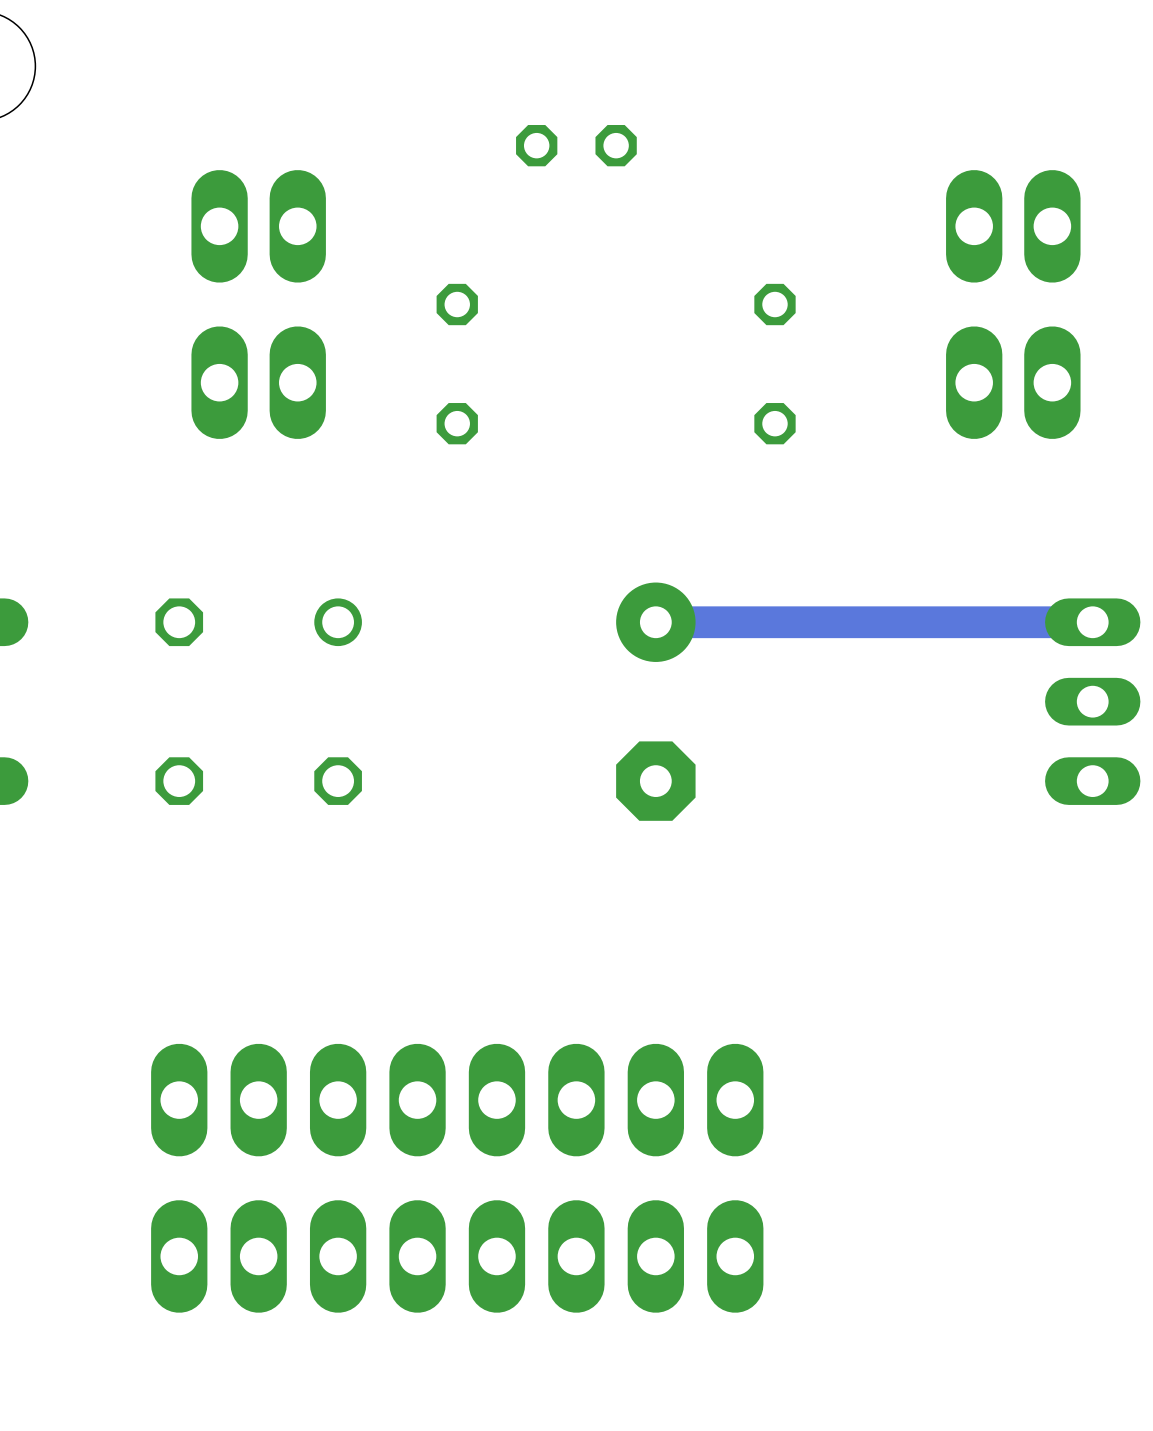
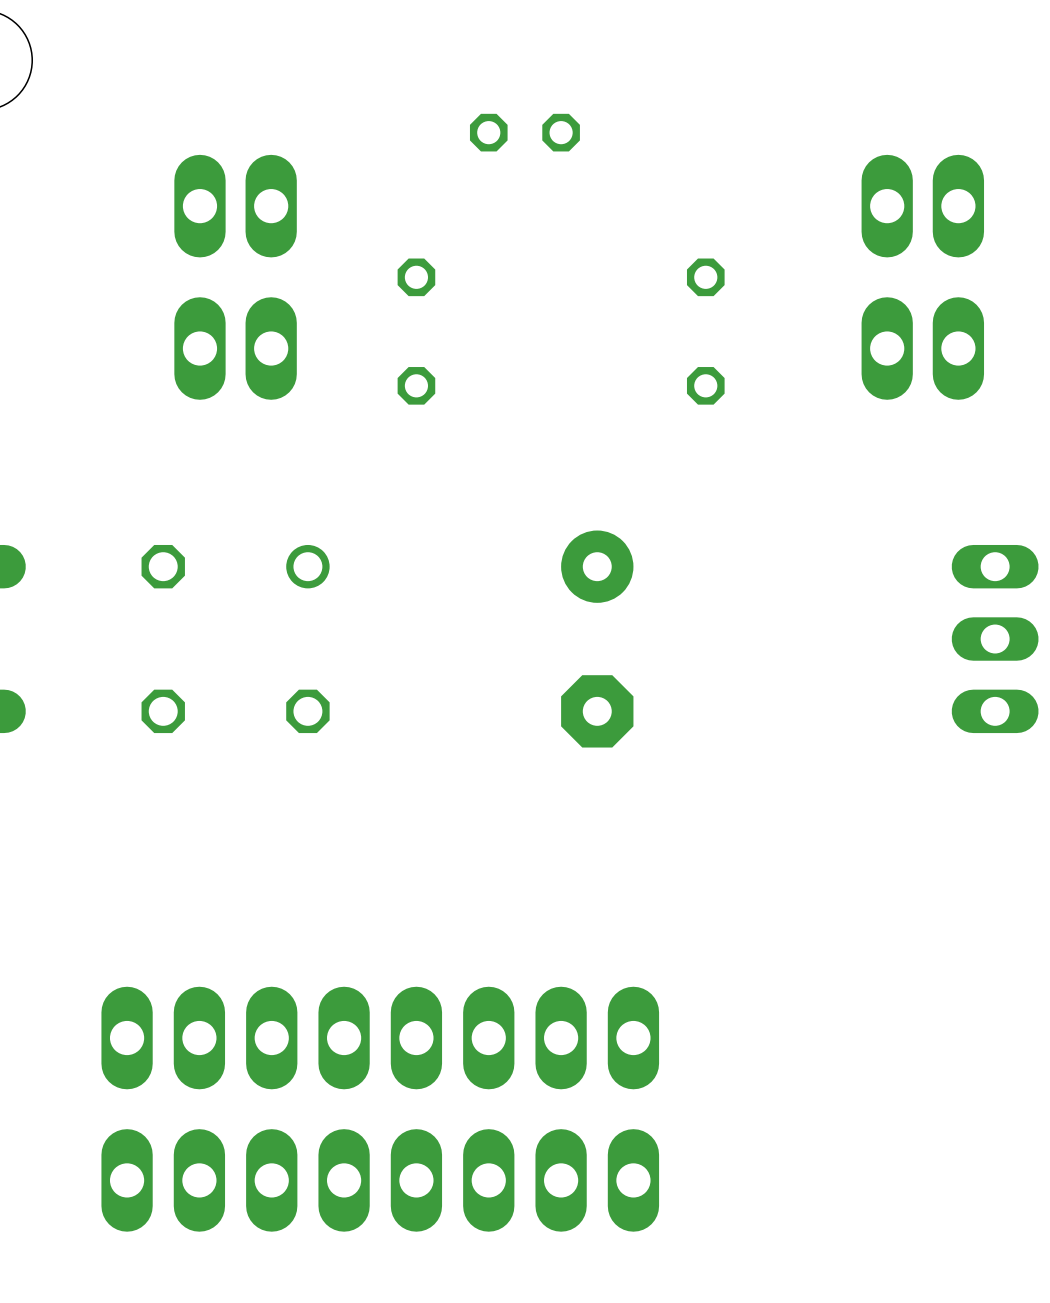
track: (1092, 622) (655, 622) -> none
part position: (457, 1178) -> (380, 1109)

